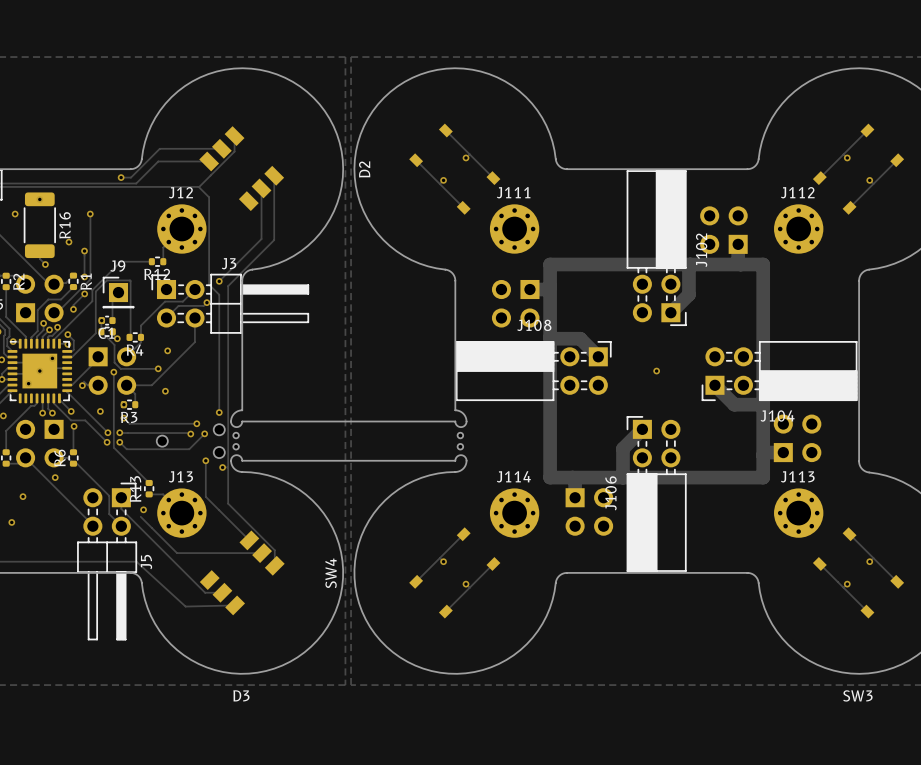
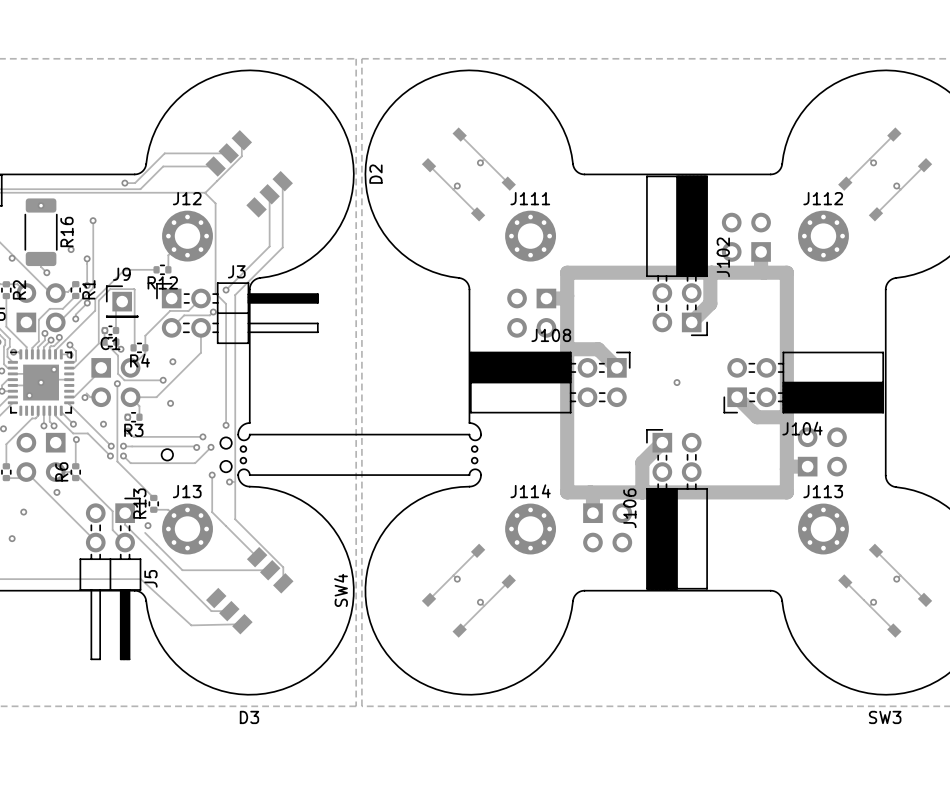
via position: (15, 214) -> (12, 258)

